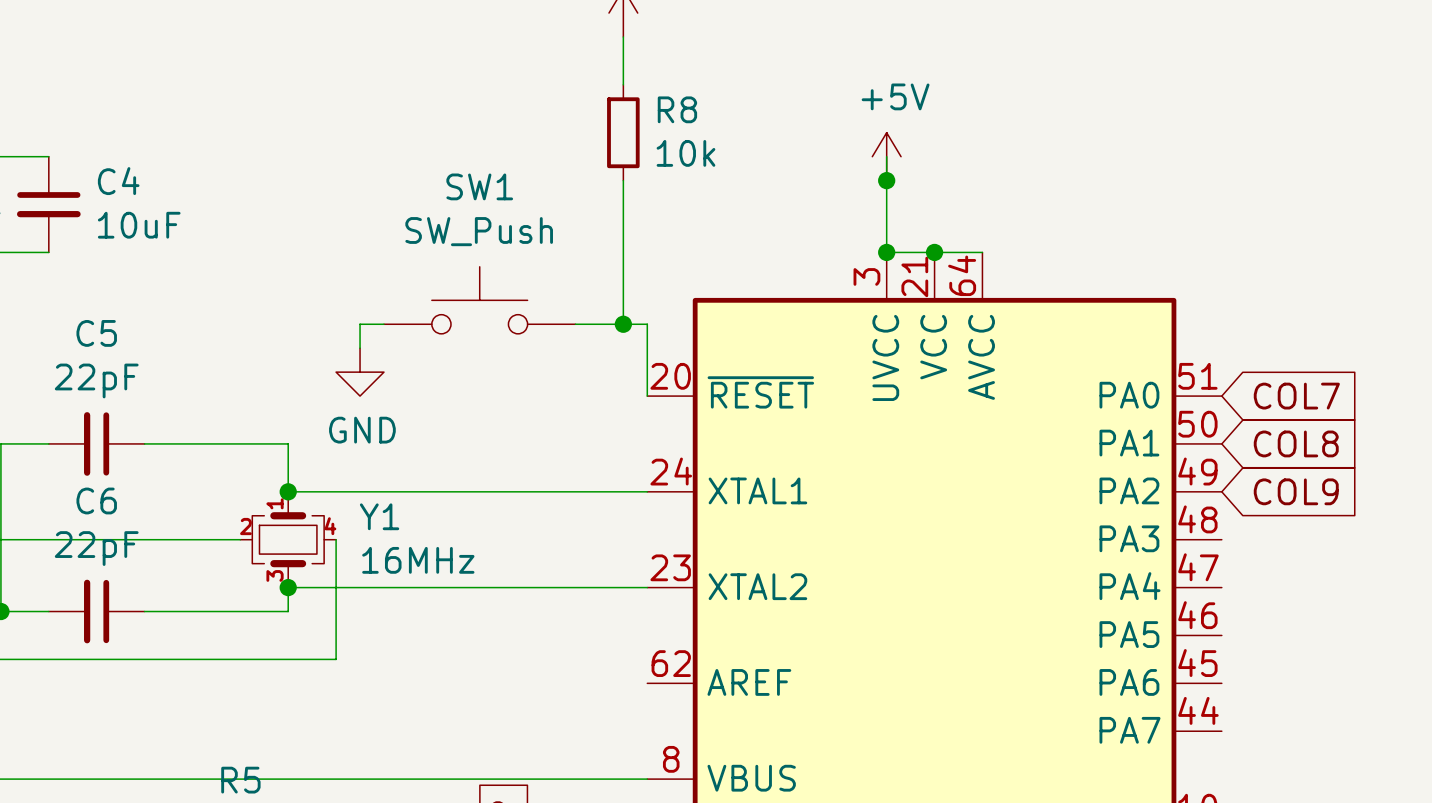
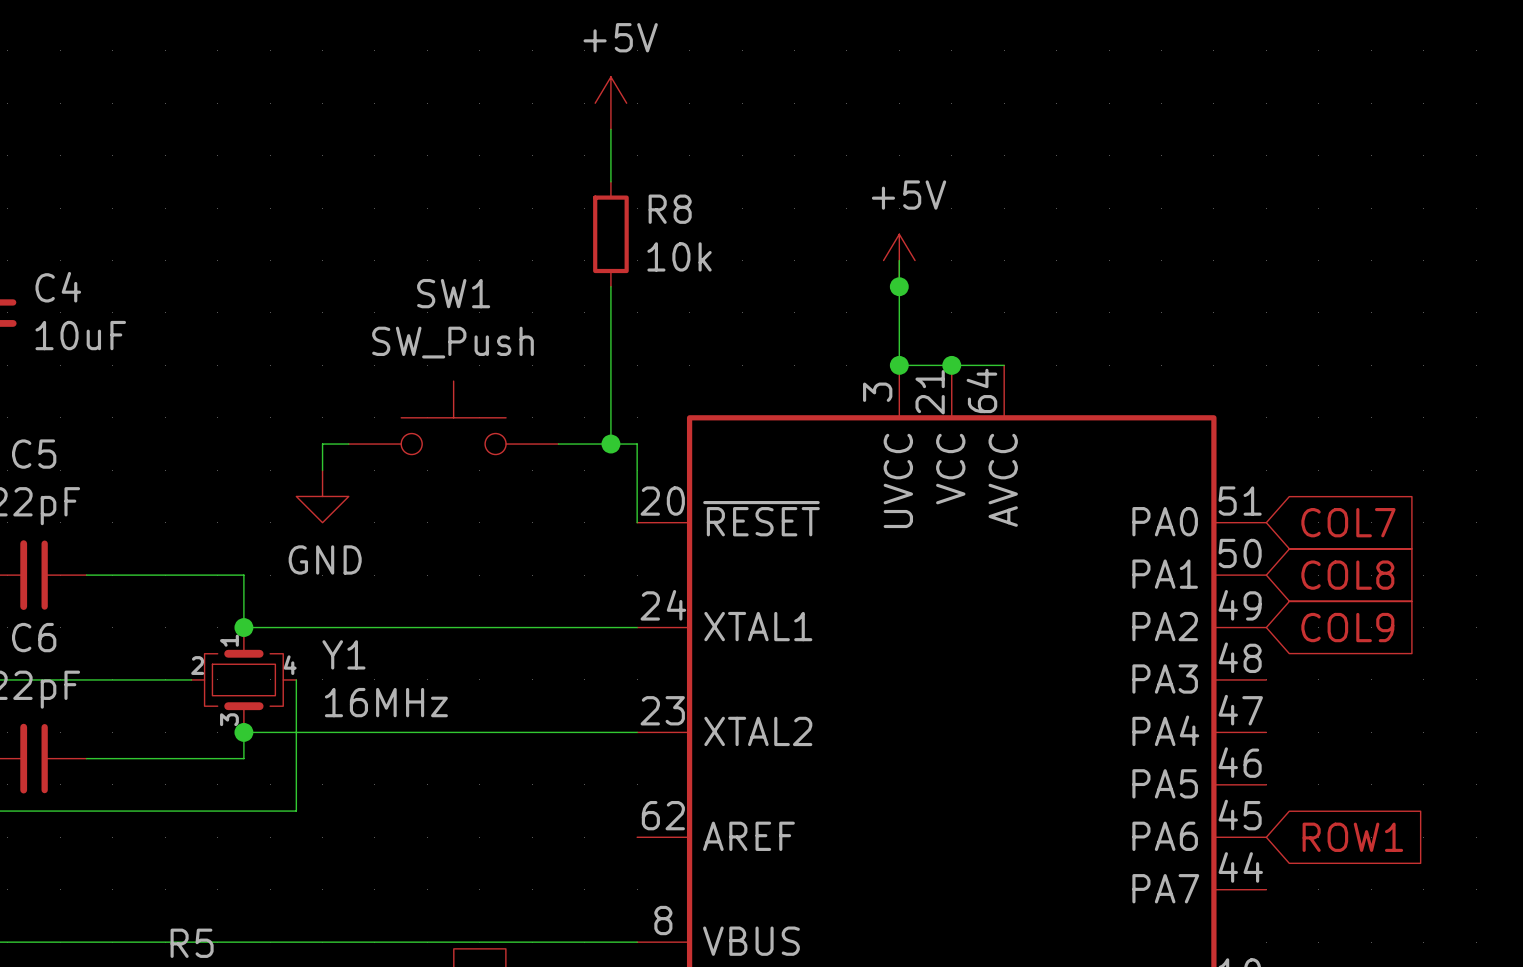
global label: none -> ROW1 (1352, 837)

